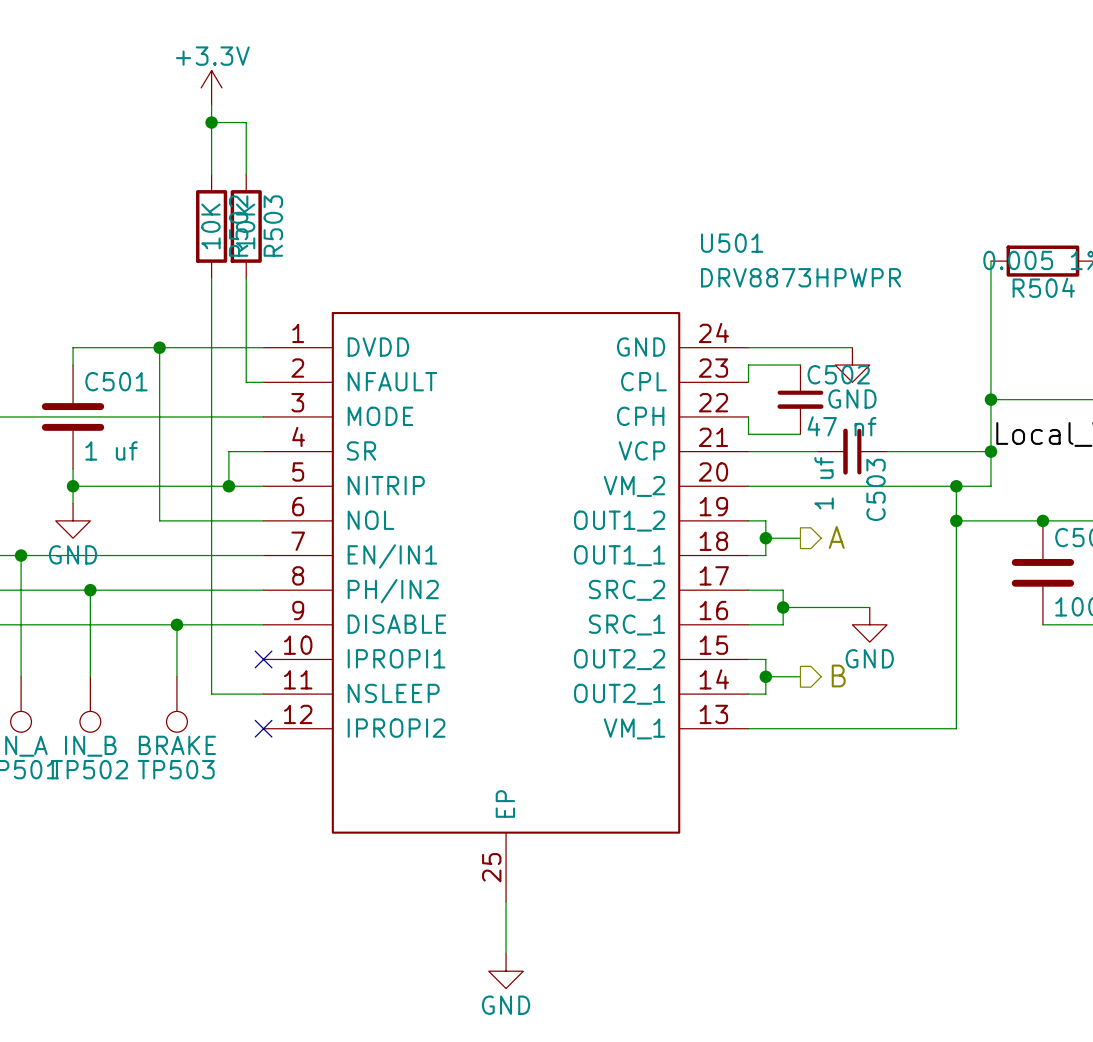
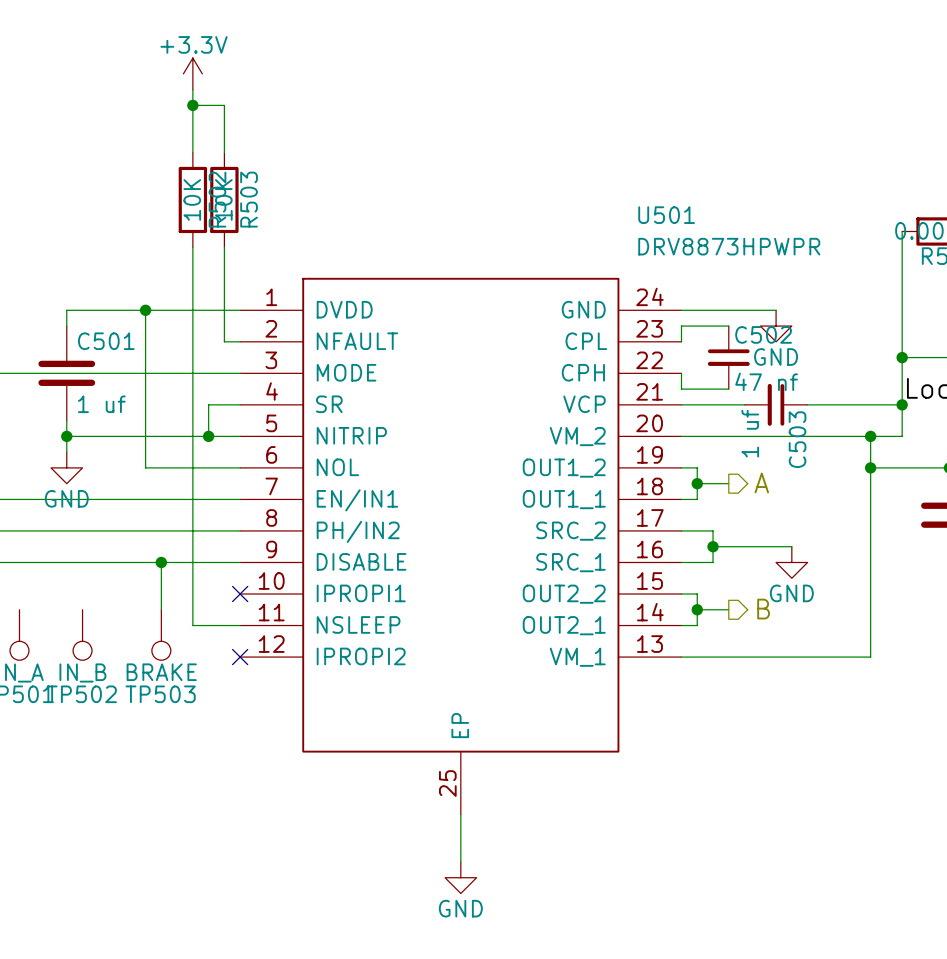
wire: (21, 555) (21, 676) -> none
junction: (21, 555) -> none
wire: (90, 590) (90, 676) -> none
junction: (90, 590) -> none

